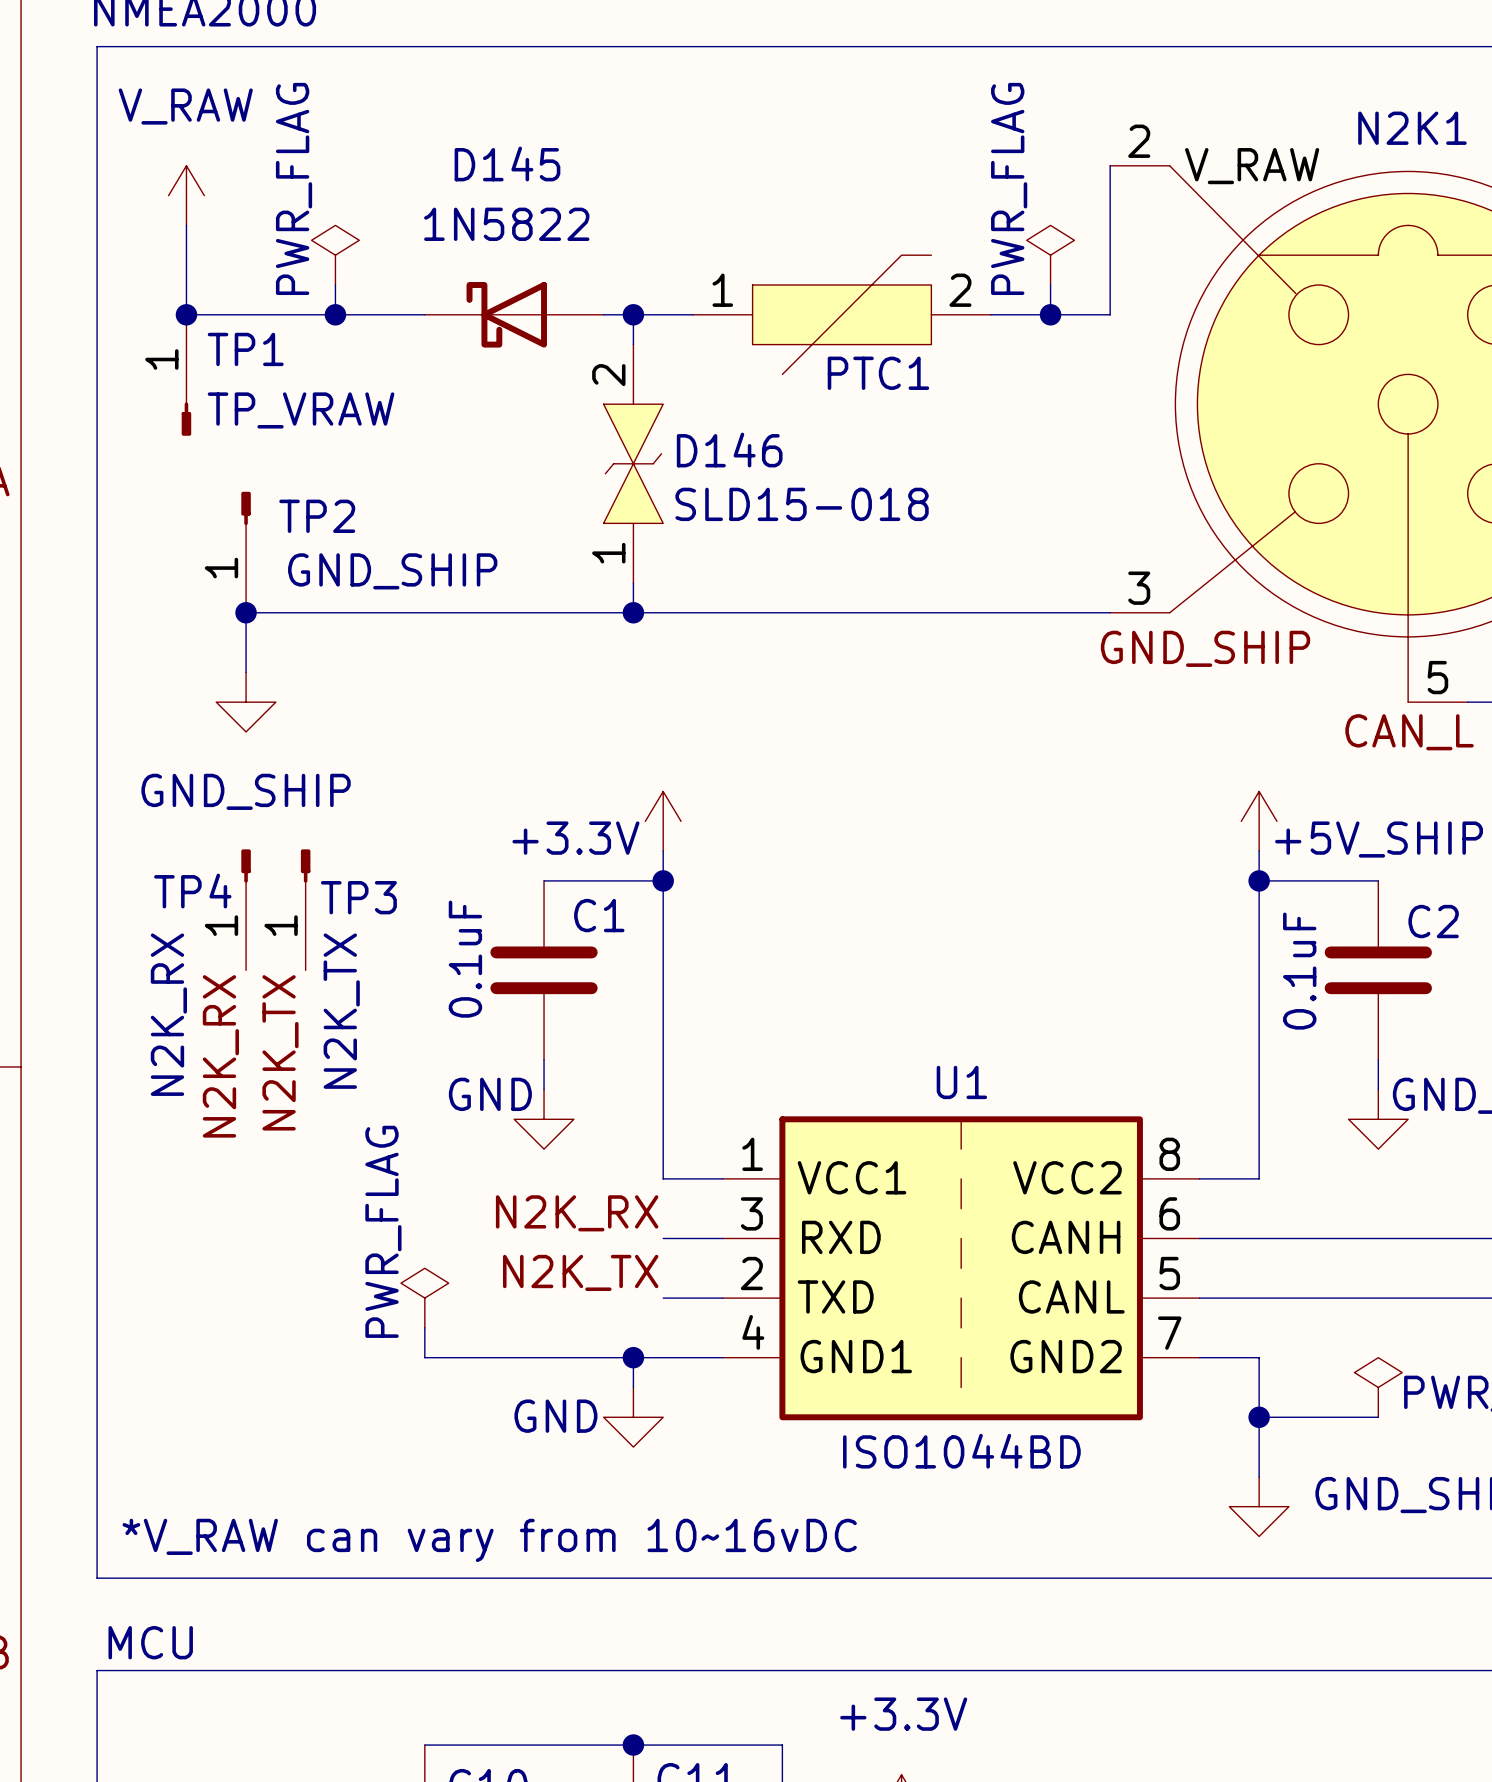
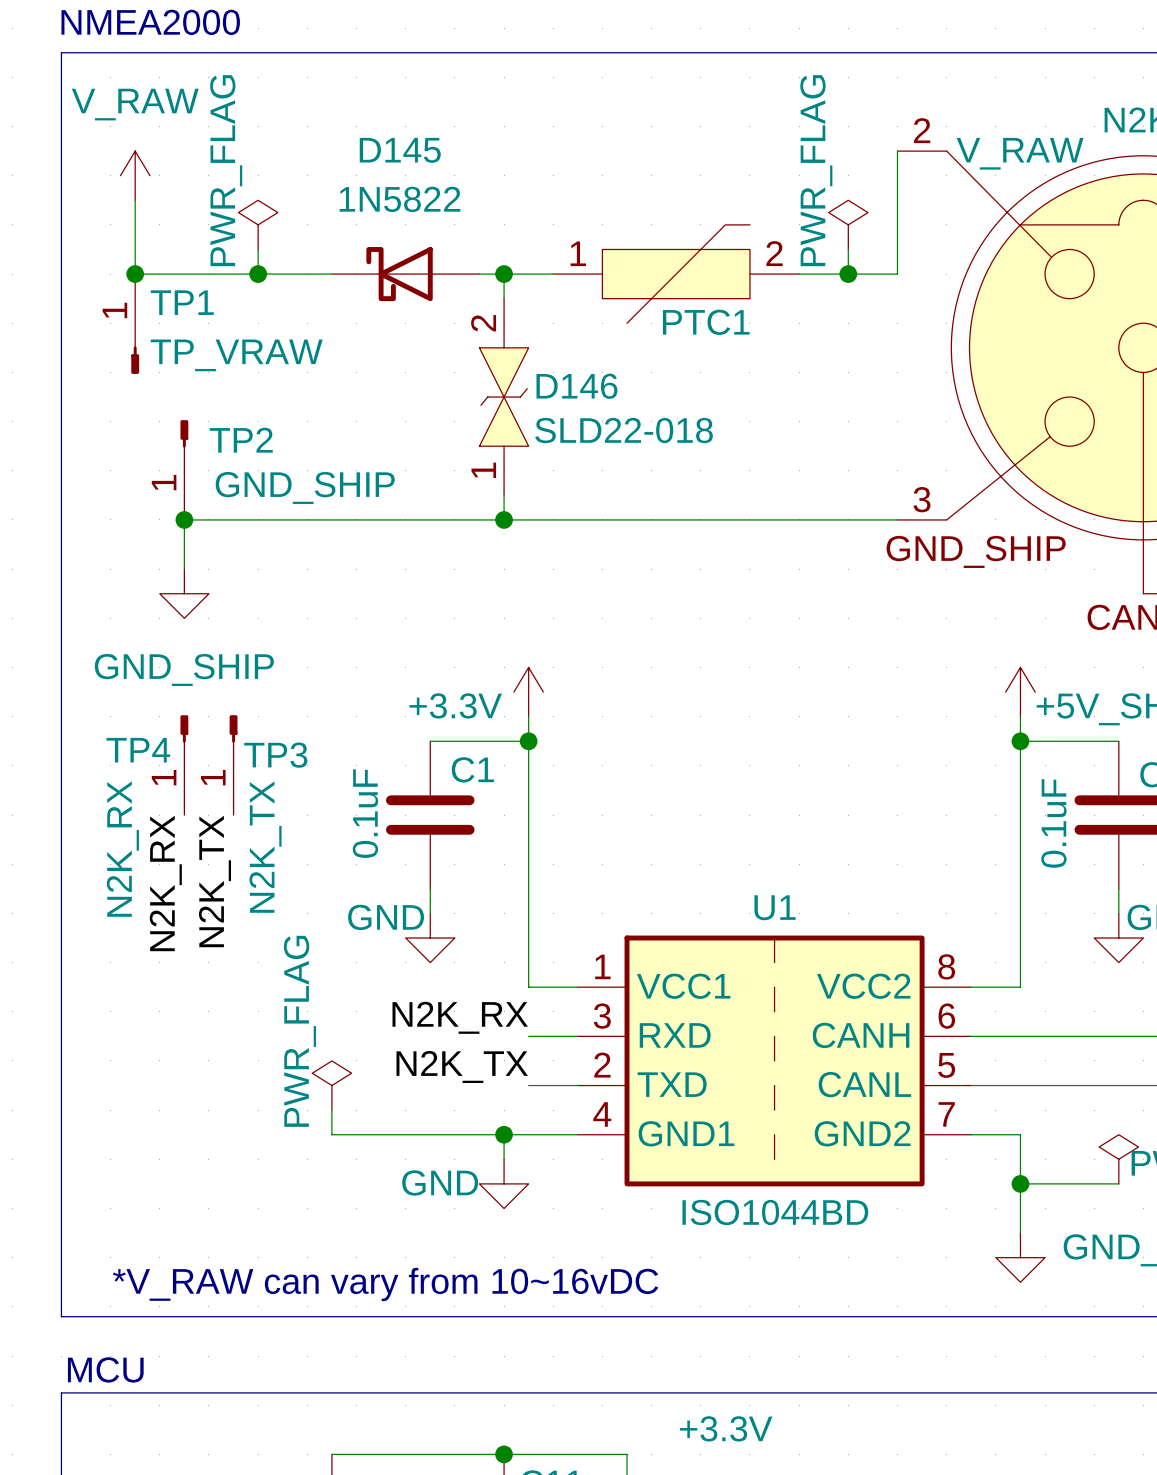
D146 value: SLD15-018 (802, 504) -> SLD22-018 (624, 430)

